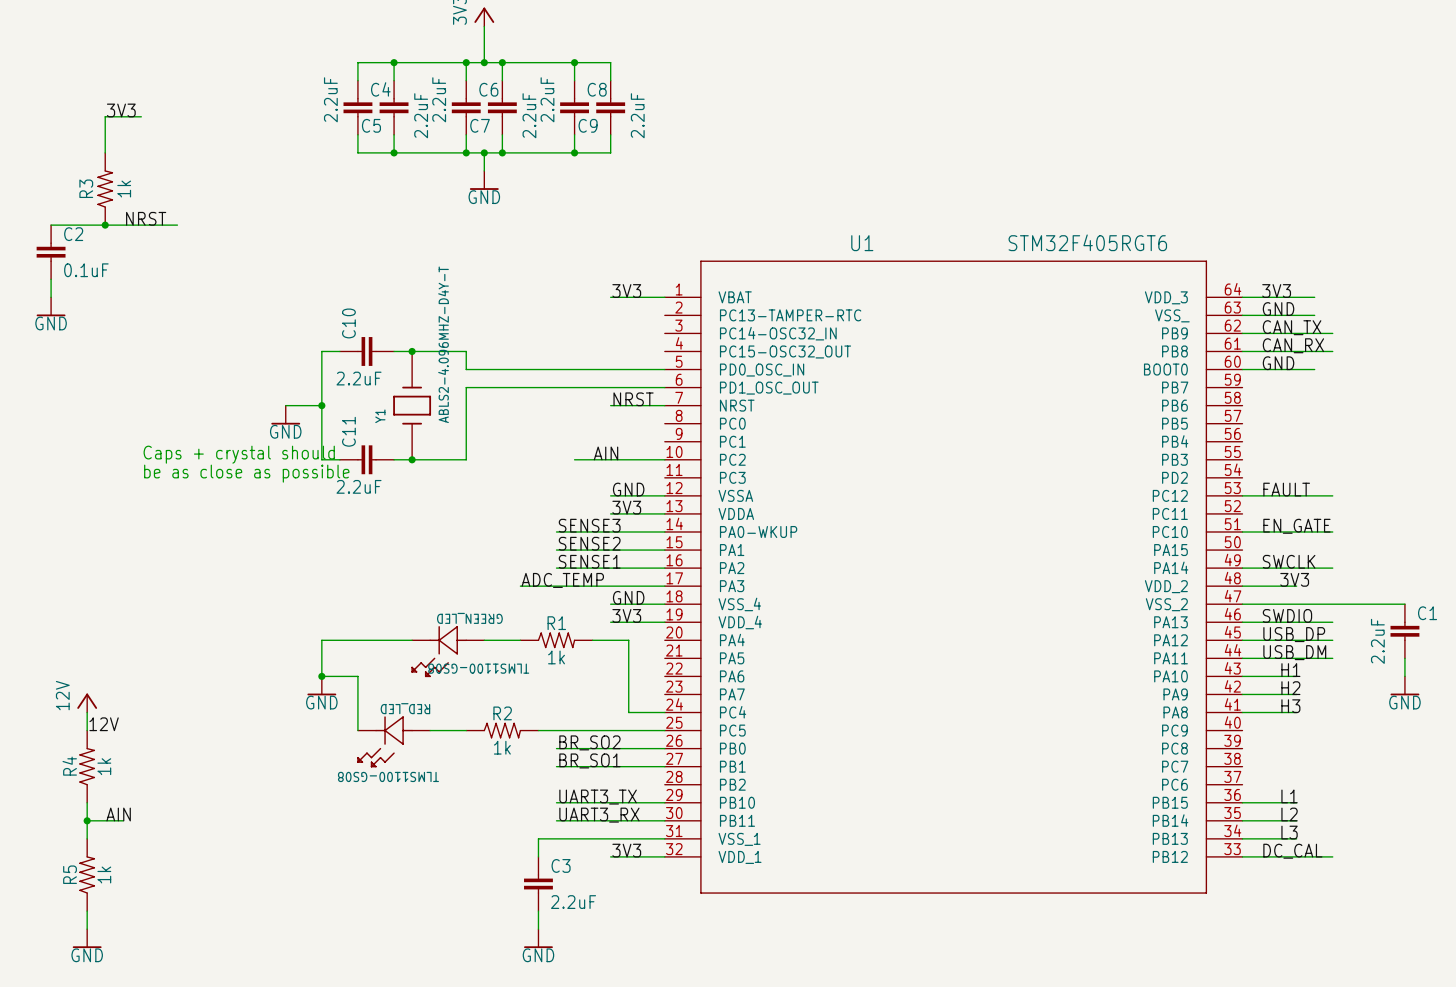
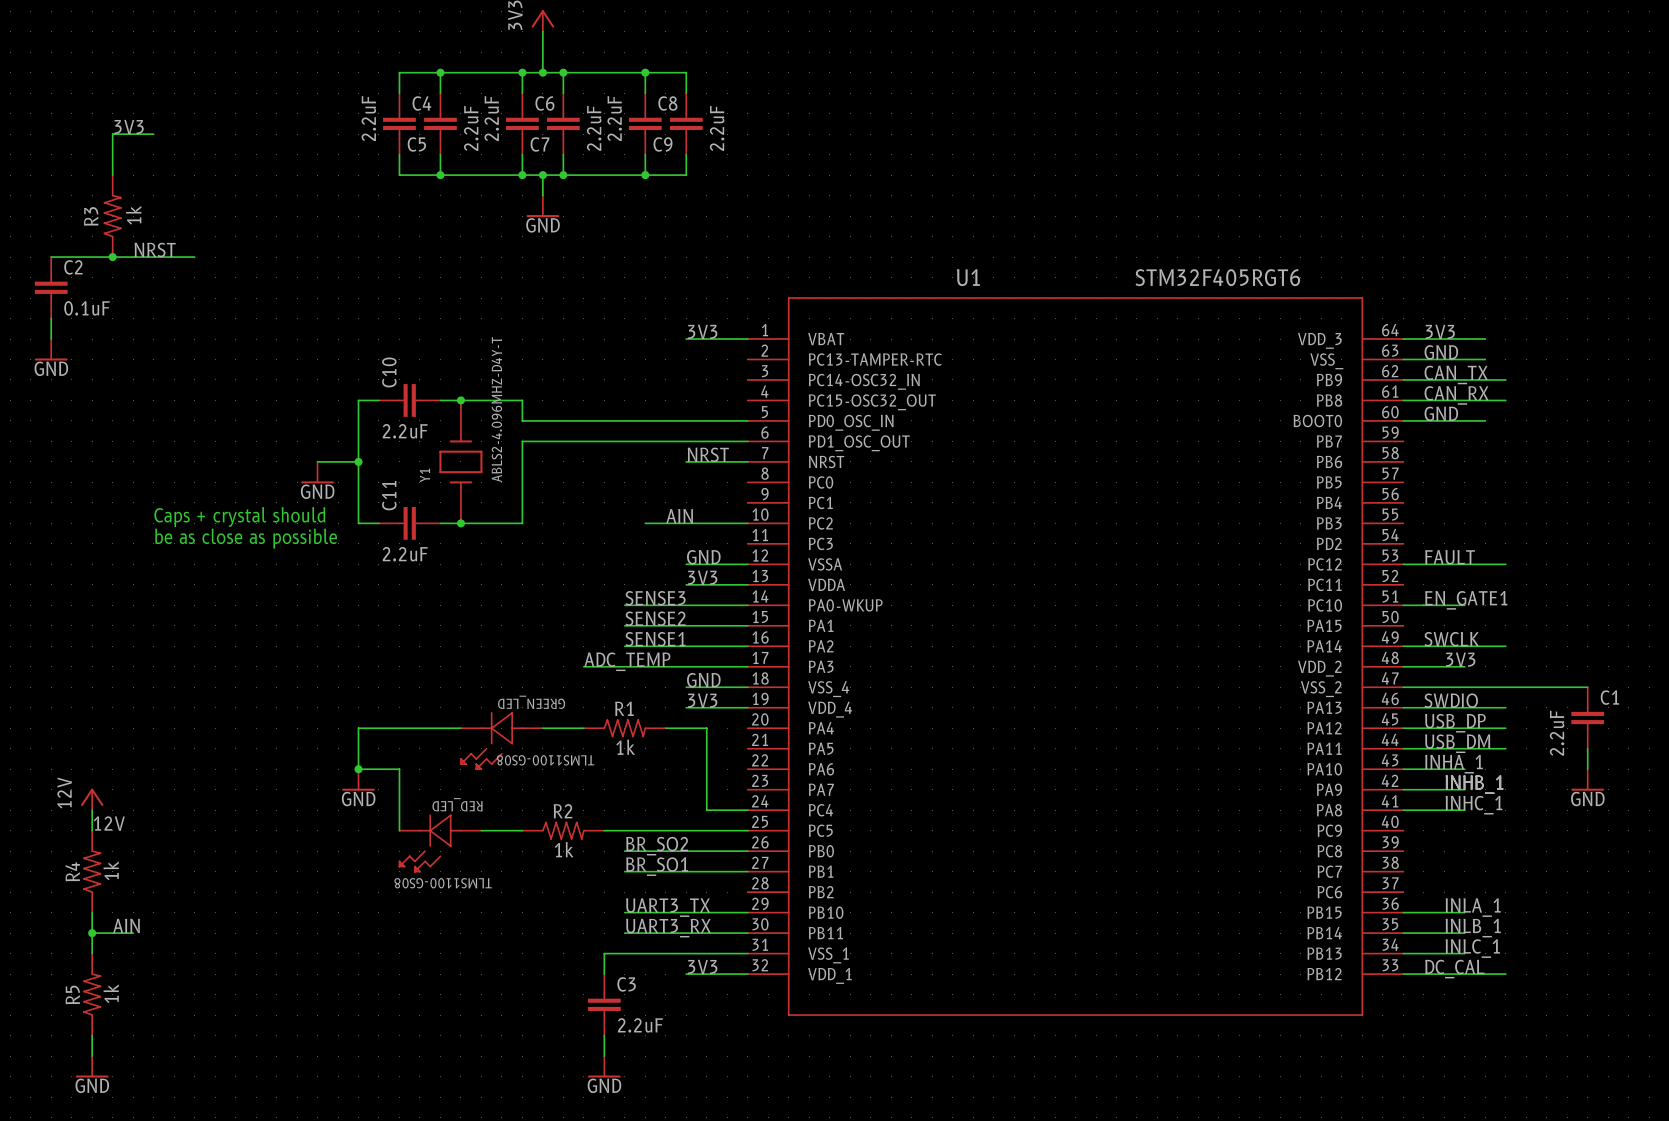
label: EN_GATE (1296, 526) -> EN_GATE1 (1466, 600)
wire: (1296, 531) (1332, 531) -> none
label: H1 (1290, 670) -> none
label: none -> INHA_1 (1453, 764)
label: H2 (1290, 688) -> INHB_1 (1474, 784)
label: H3 (1290, 706) -> INHC_1 (1474, 805)
label: L1 (1289, 796) -> INLA_1 (1473, 907)
label: L2 (1289, 814) -> INLB_1 (1473, 928)
label: L3 (1289, 832) -> INLC_1 (1472, 948)

